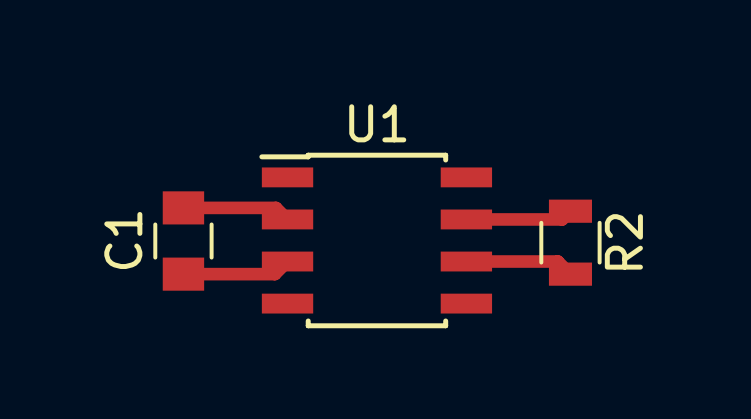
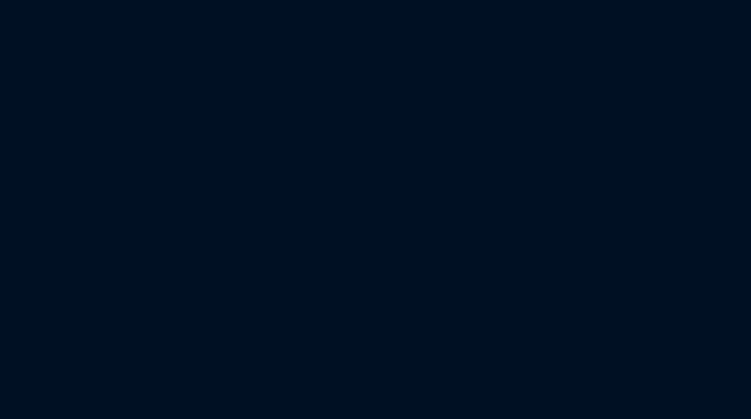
top track: (183, 207) (275, 207) (287, 219) -> none
top track: (570, 211) (562, 219) (466, 219) -> none
U1: (375, 240) -> none
C1: (183, 241) -> none
R2: (570, 242) -> none
top track: (287, 261) (274, 274) (183, 274) -> none
top track: (466, 261) (557, 261) (570, 274) -> none

